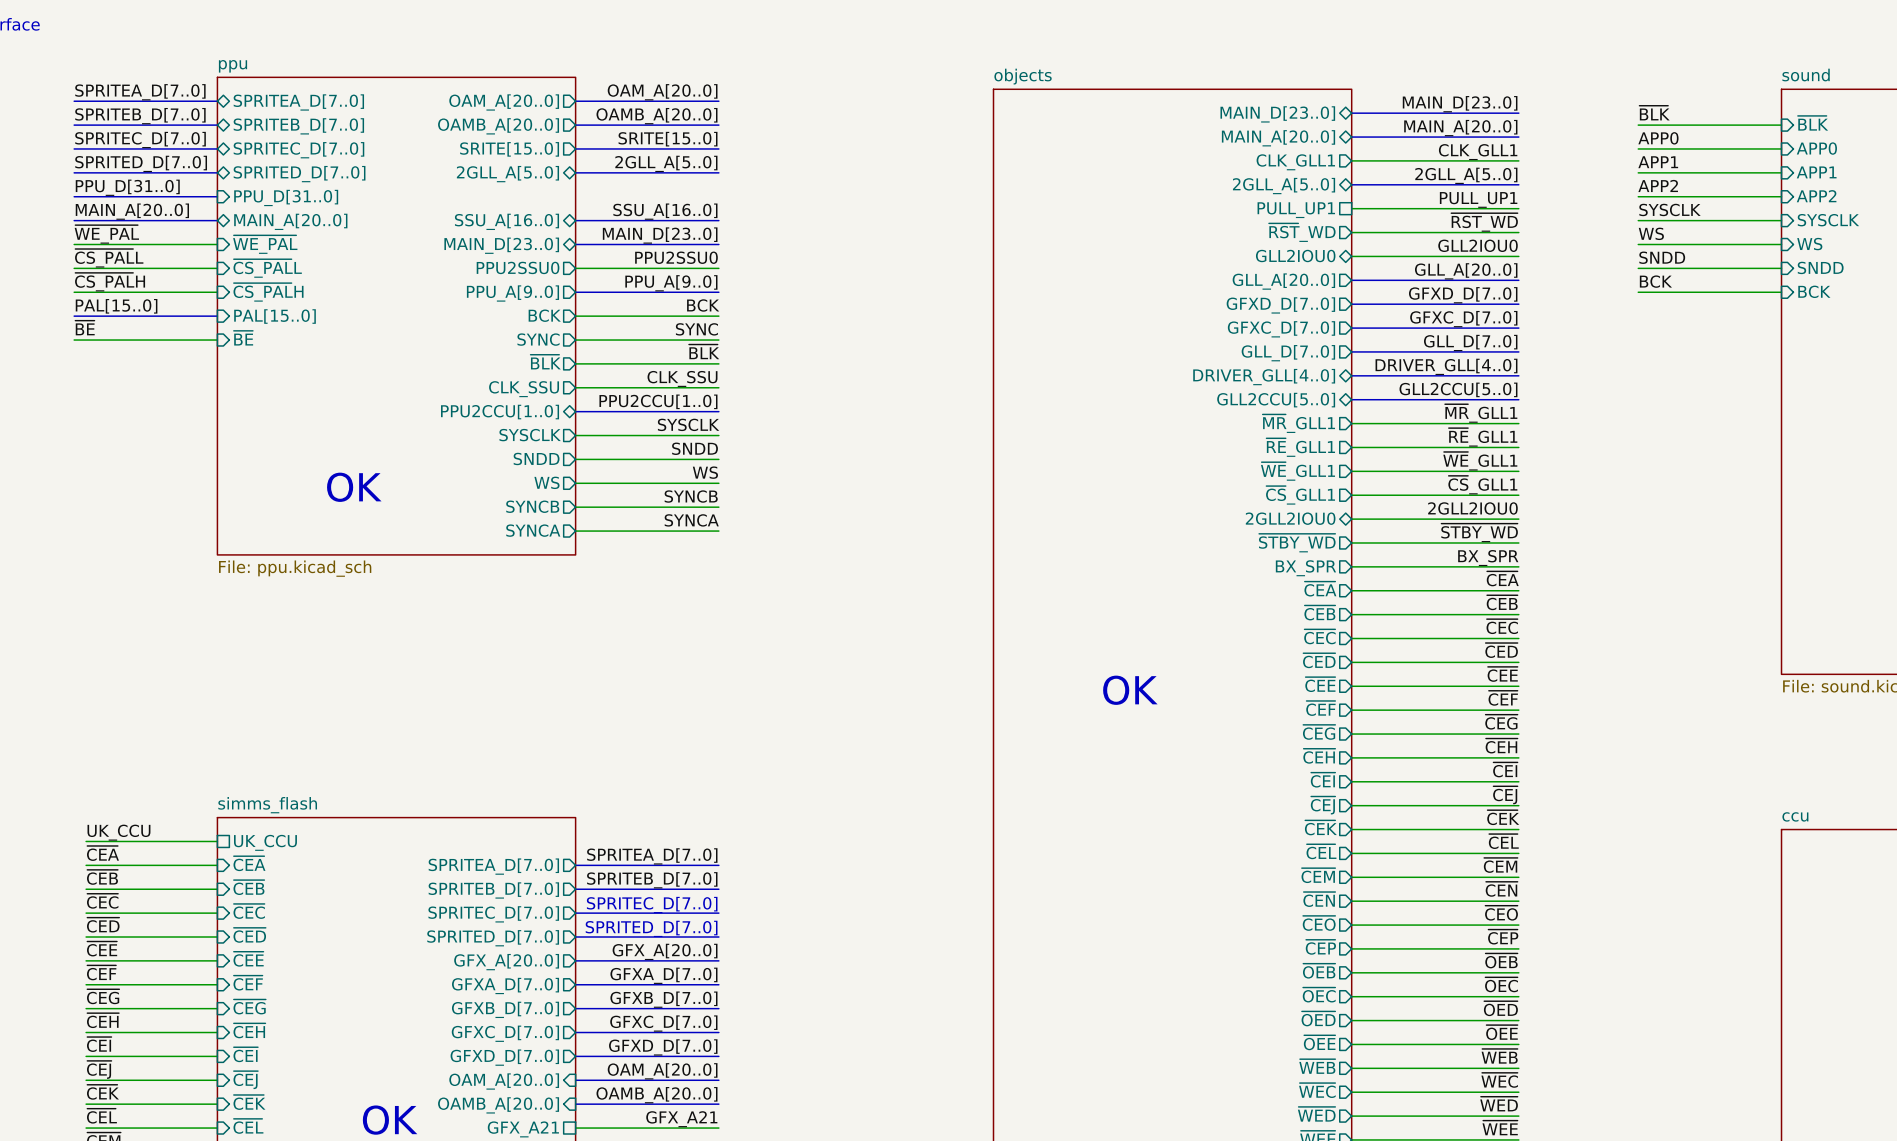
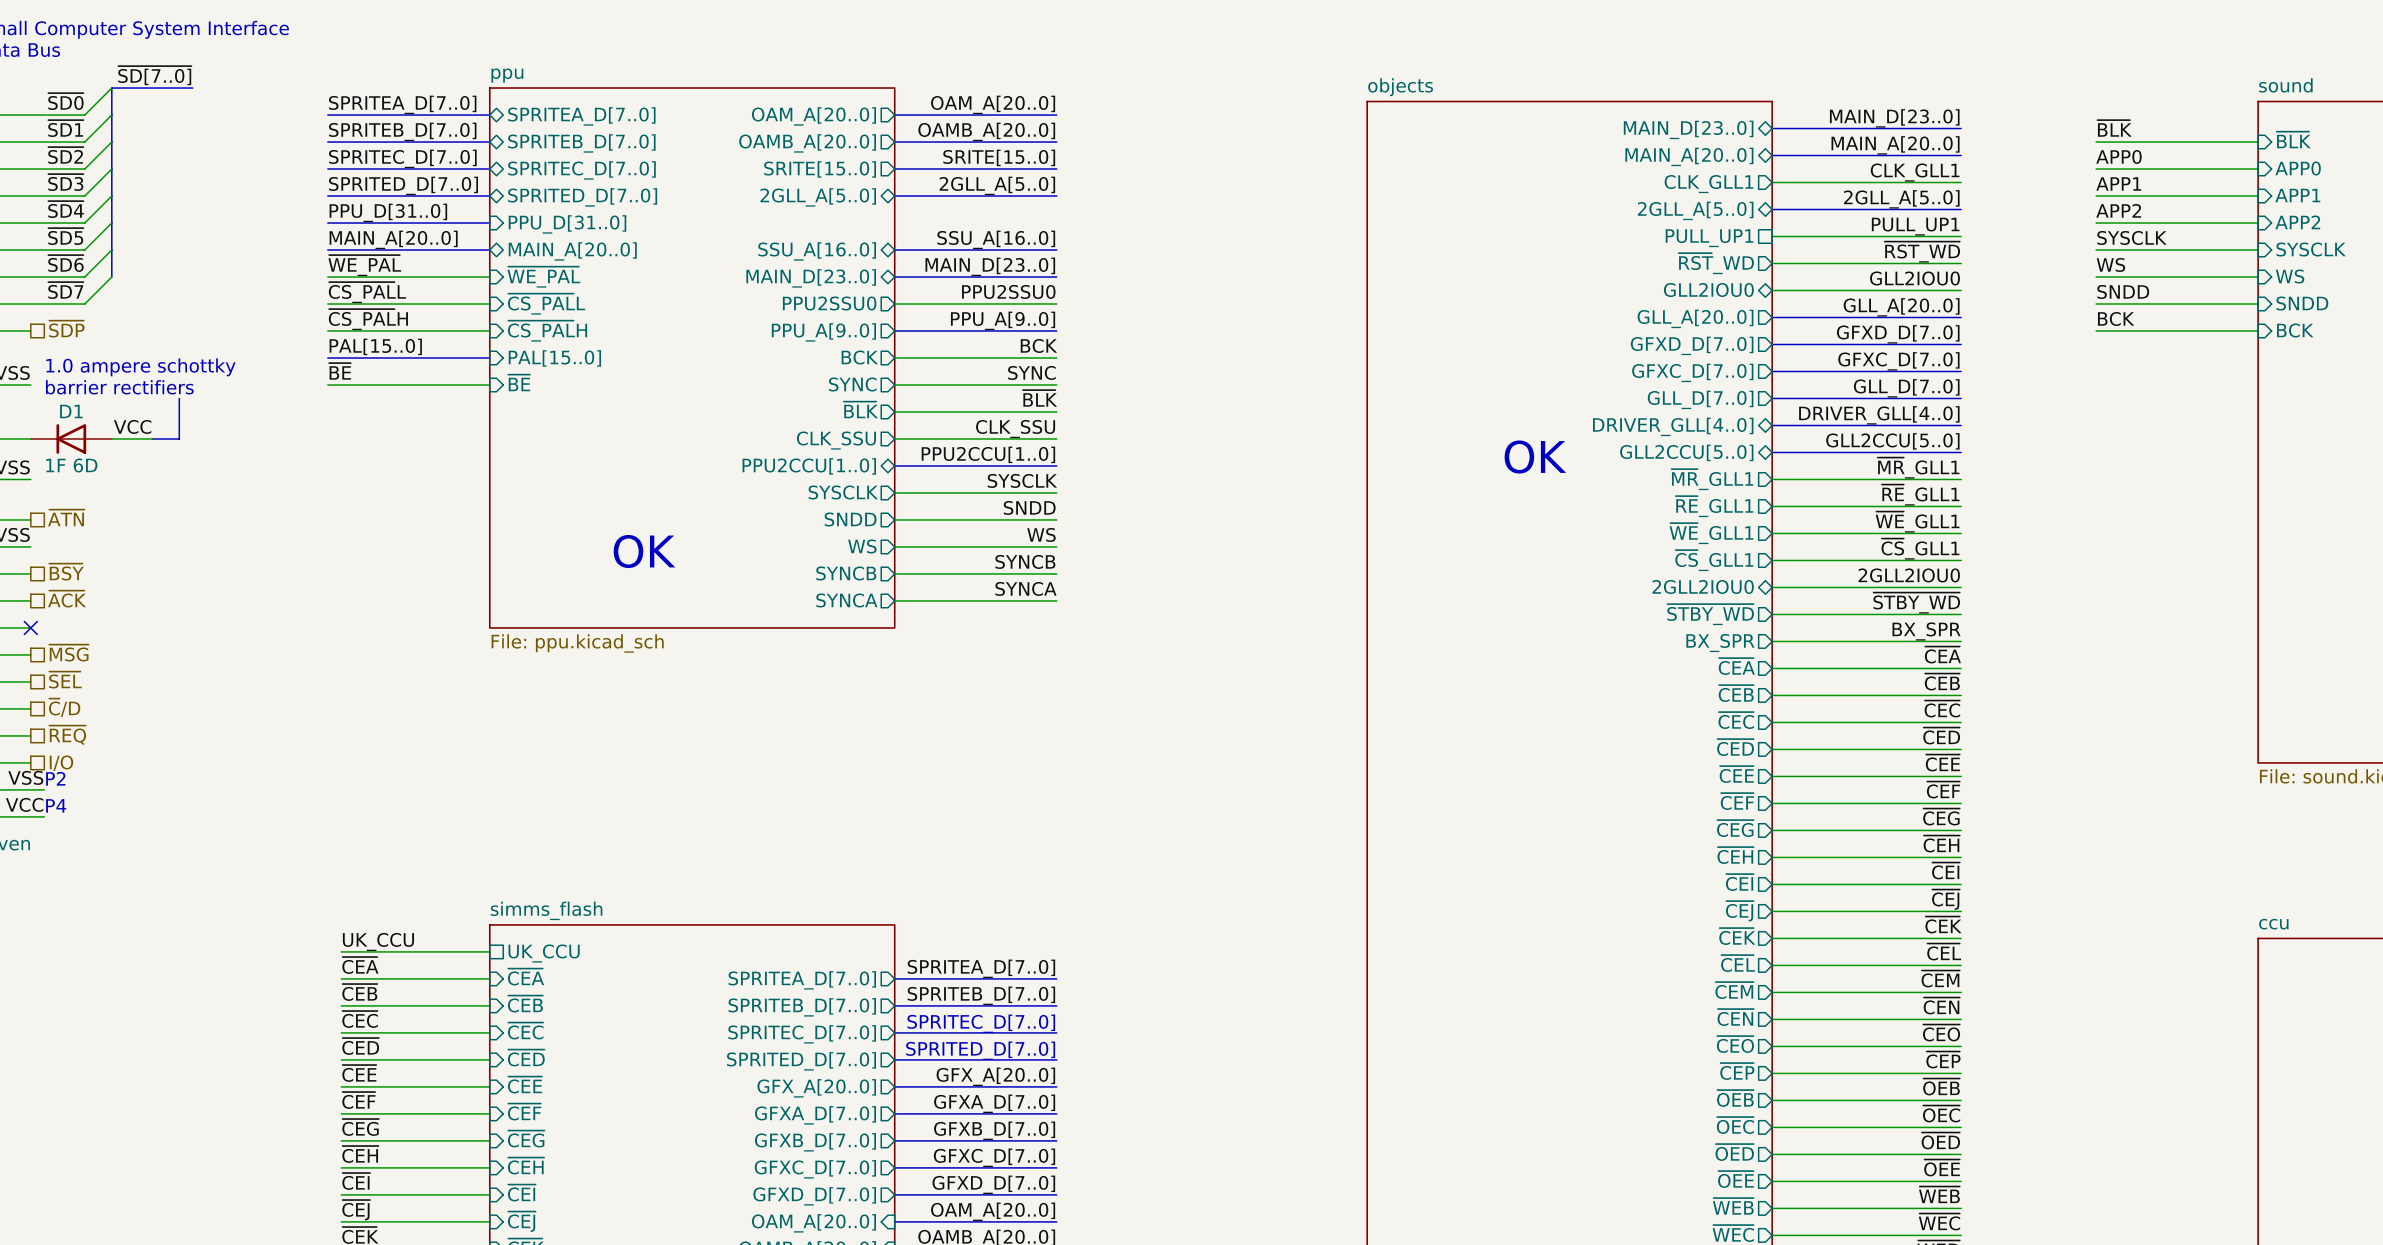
text: none -> OK (1535, 457)
text: OK (1130, 690) -> none

